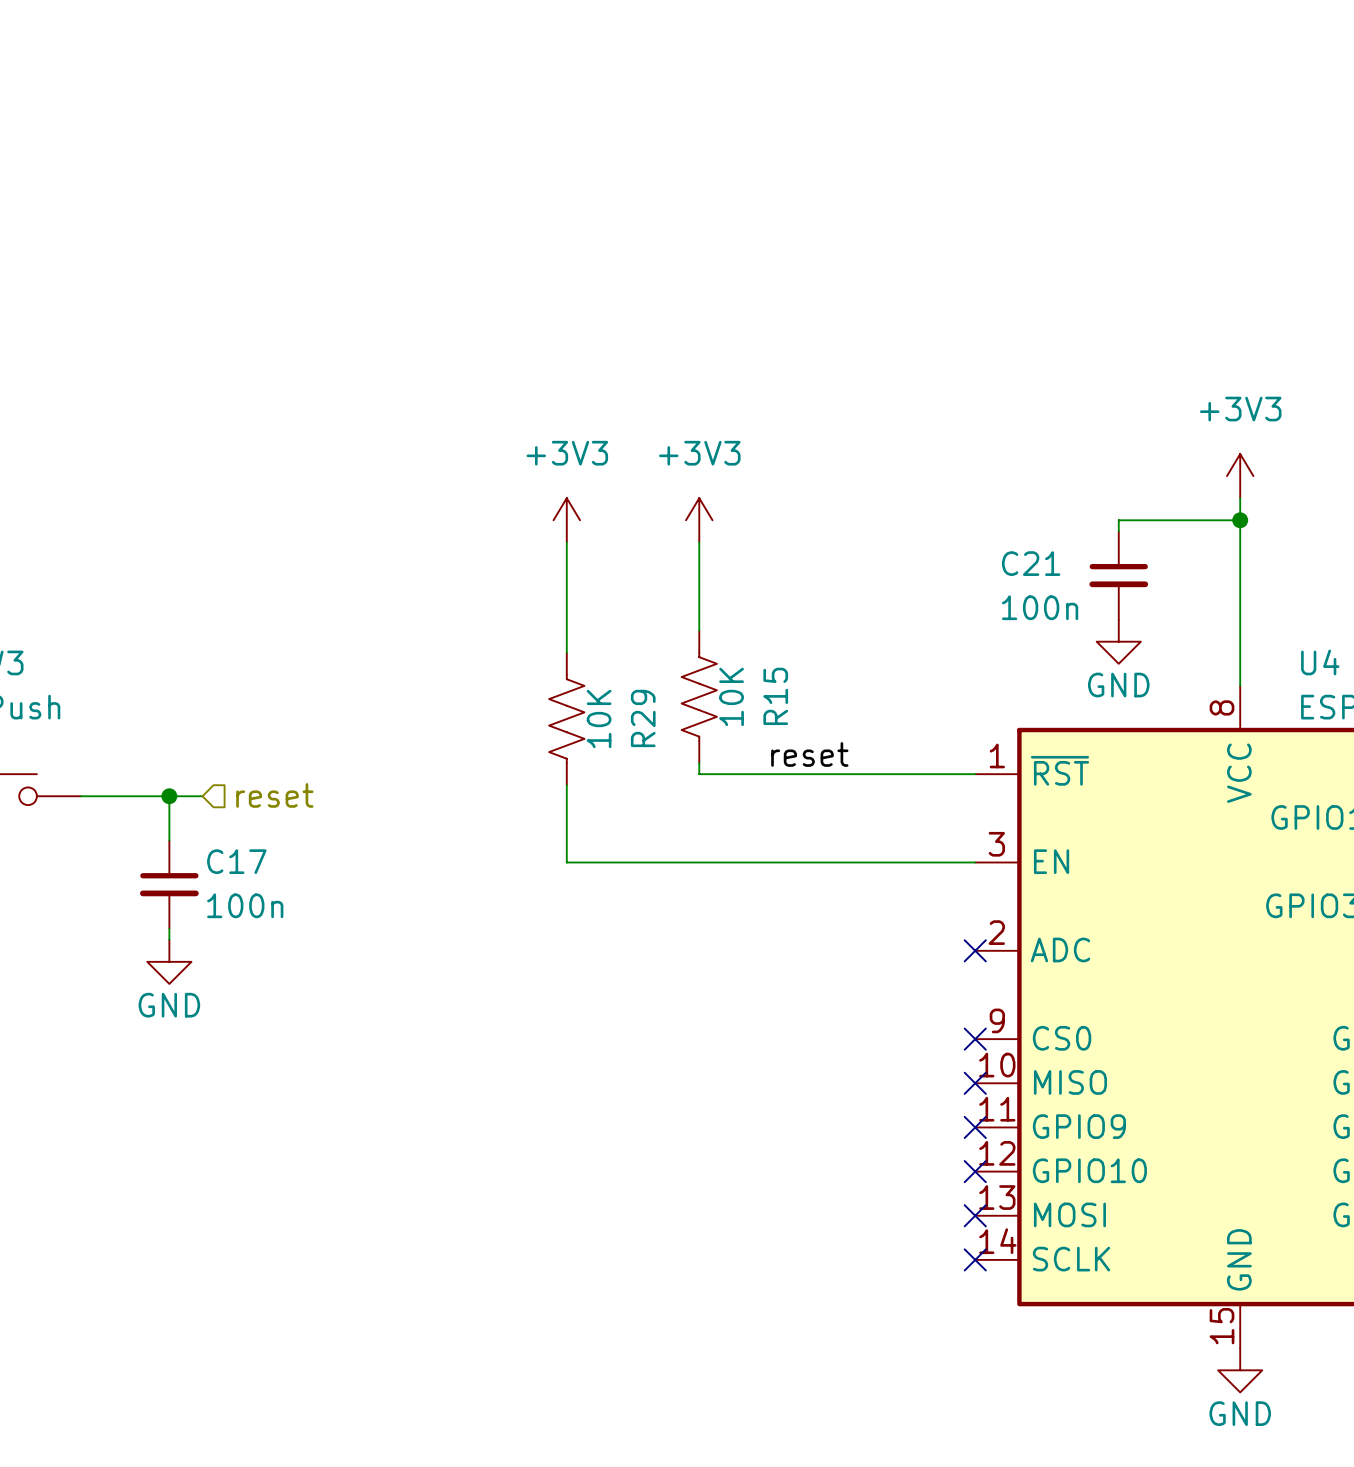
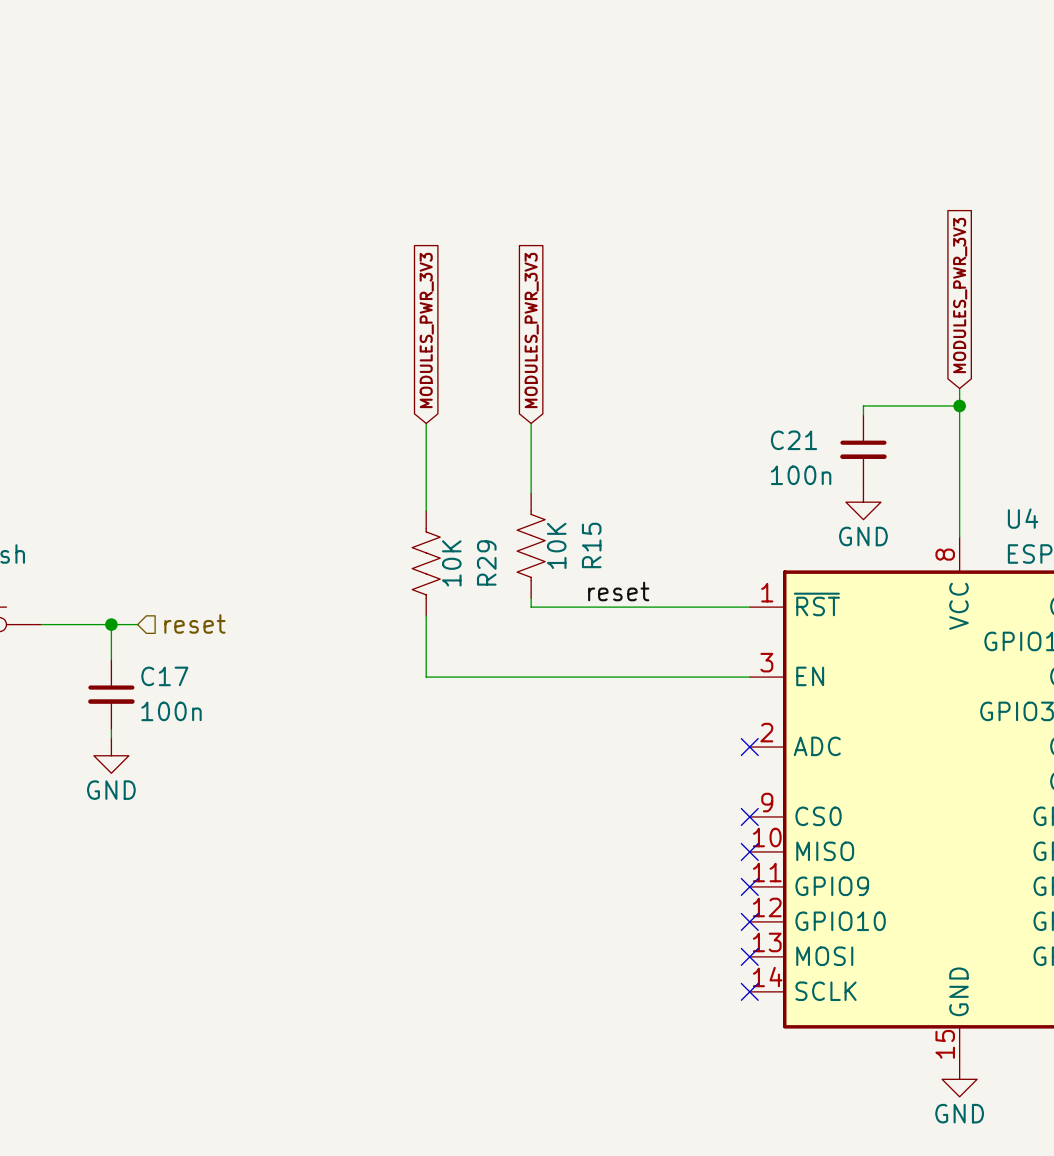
global label: none -> MODULES_PWR_3V3 (960, 295)
global label: none -> MODULES_PWR_3V3 (426, 330)
global label: none -> MODULES_PWR_3V3 (531, 330)
power symbol: +3V3 (1240, 476) -> none
power symbol: +3V3 (566, 520) -> none
power symbol: +3V3 (699, 520) -> none

